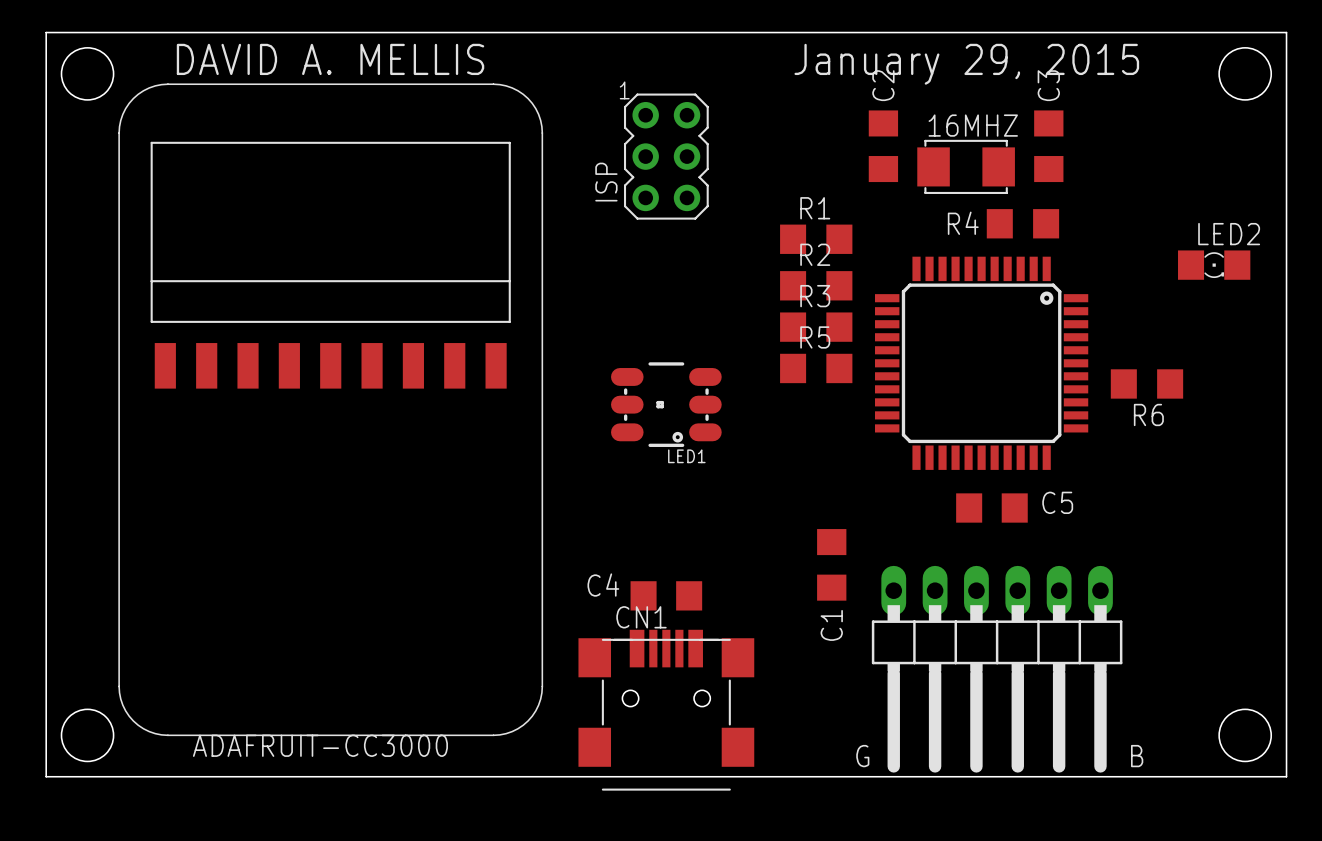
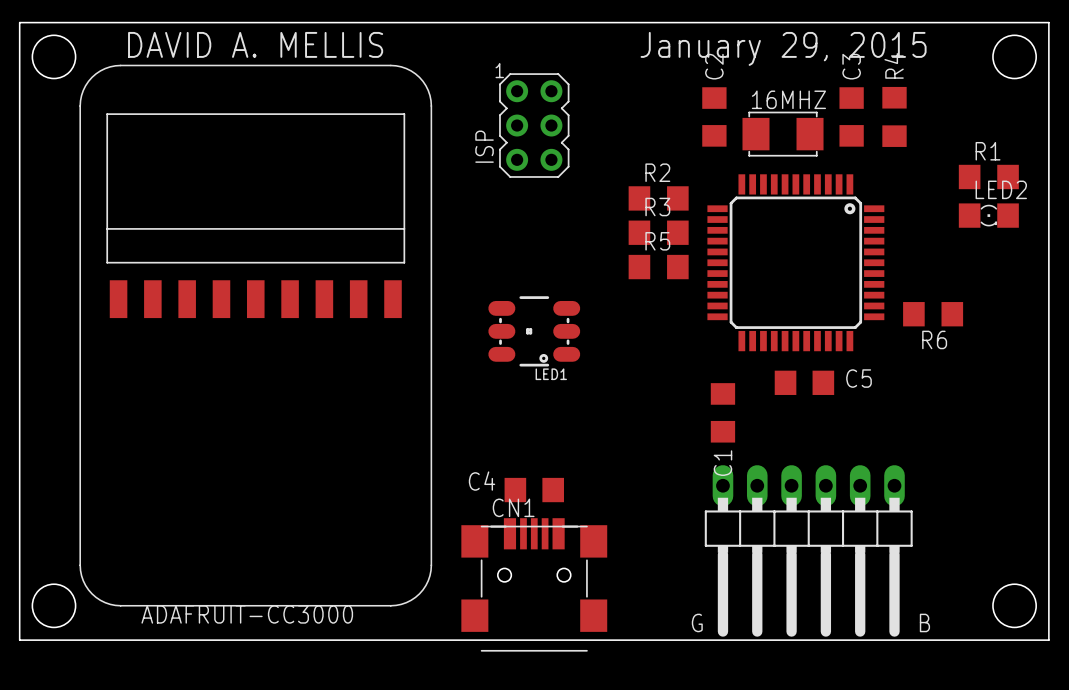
R4 rotation: 0° (1022, 223) -> 90° clockwise (894, 116)
R4 position: (1022, 223) -> (894, 116)
R1 position: (816, 239) -> (988, 176)
R2: none -> (658, 198)
R2 name: R2 (815, 254) -> R3 (657, 207)
R3 name: R3 (815, 296) -> R5 (657, 241)
part position: (981, 363) -> (795, 262)
R5: (816, 368) -> none
C5 position: (991, 508) -> (804, 382)
C1 position: (831, 564) -> (722, 412)

